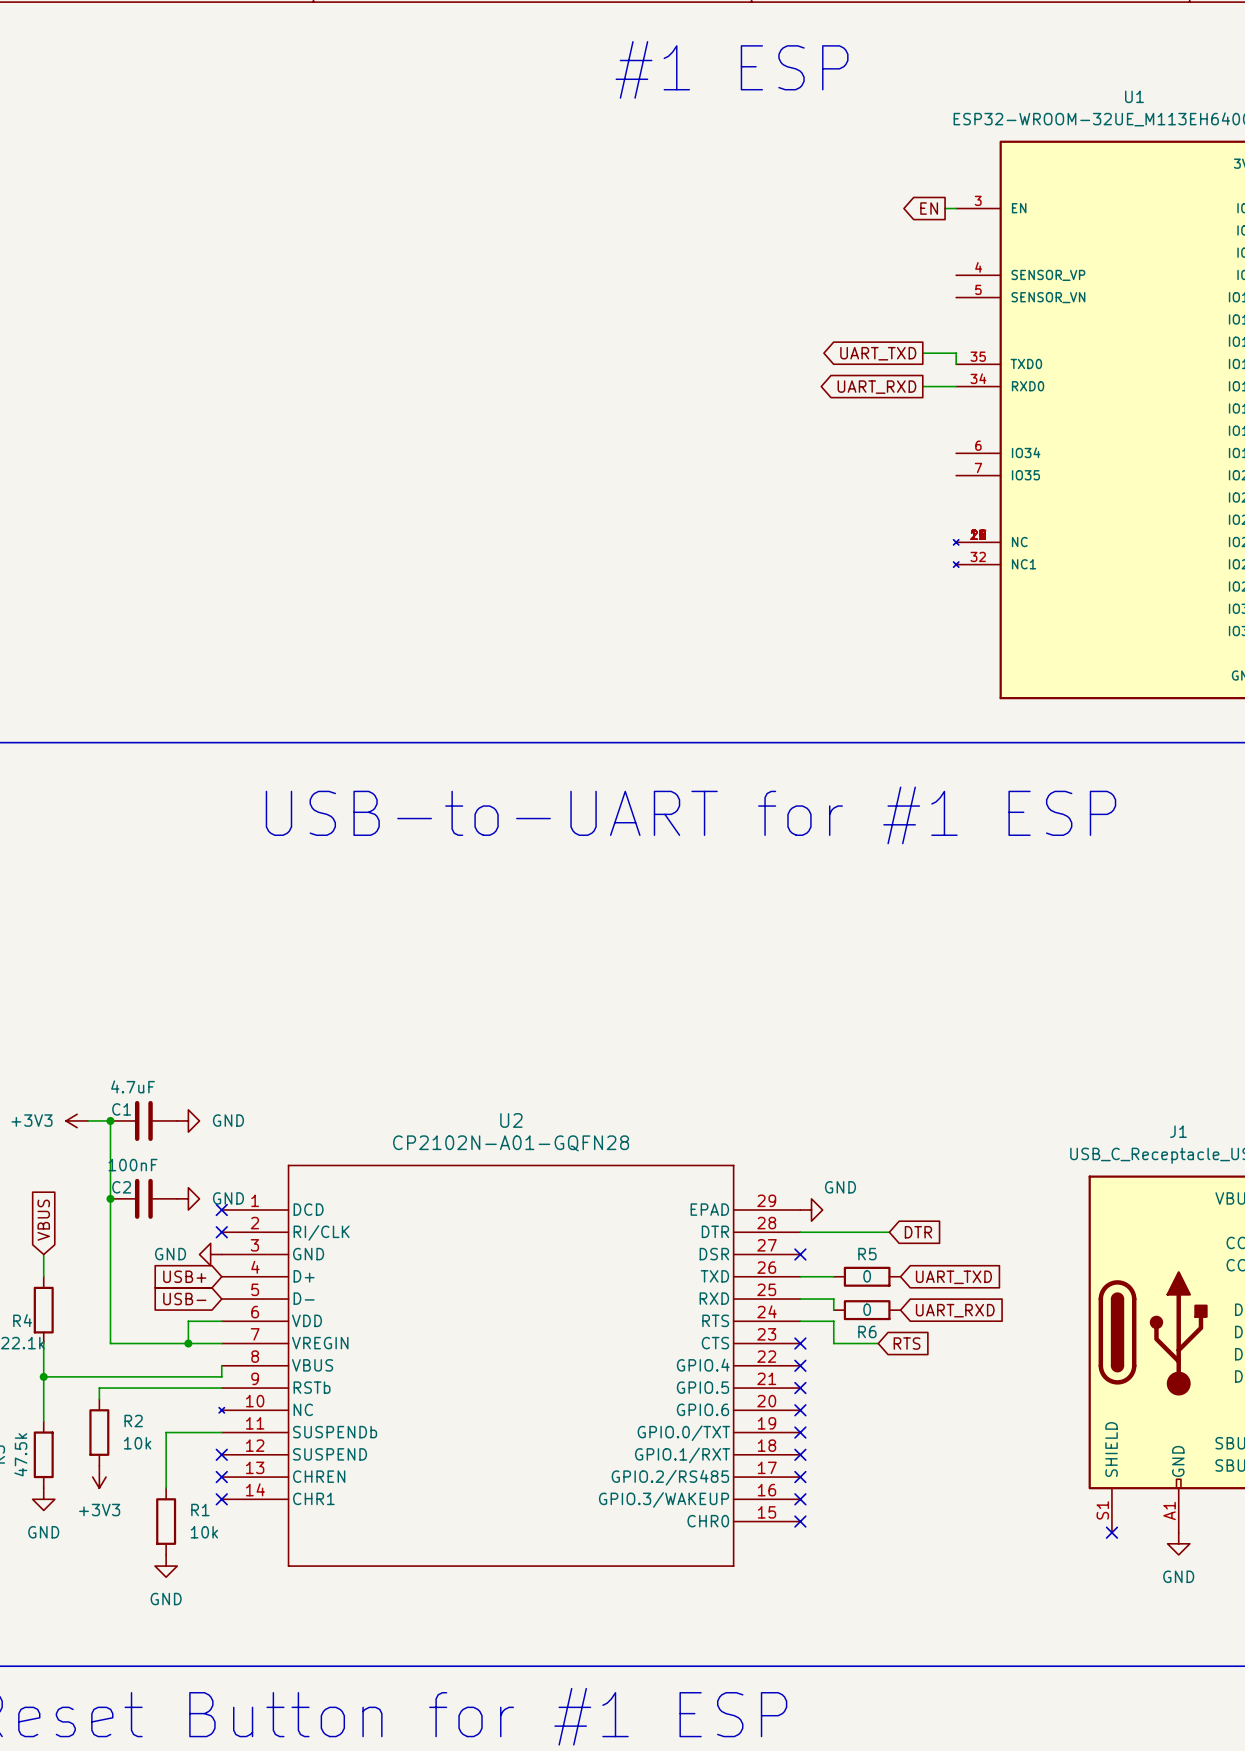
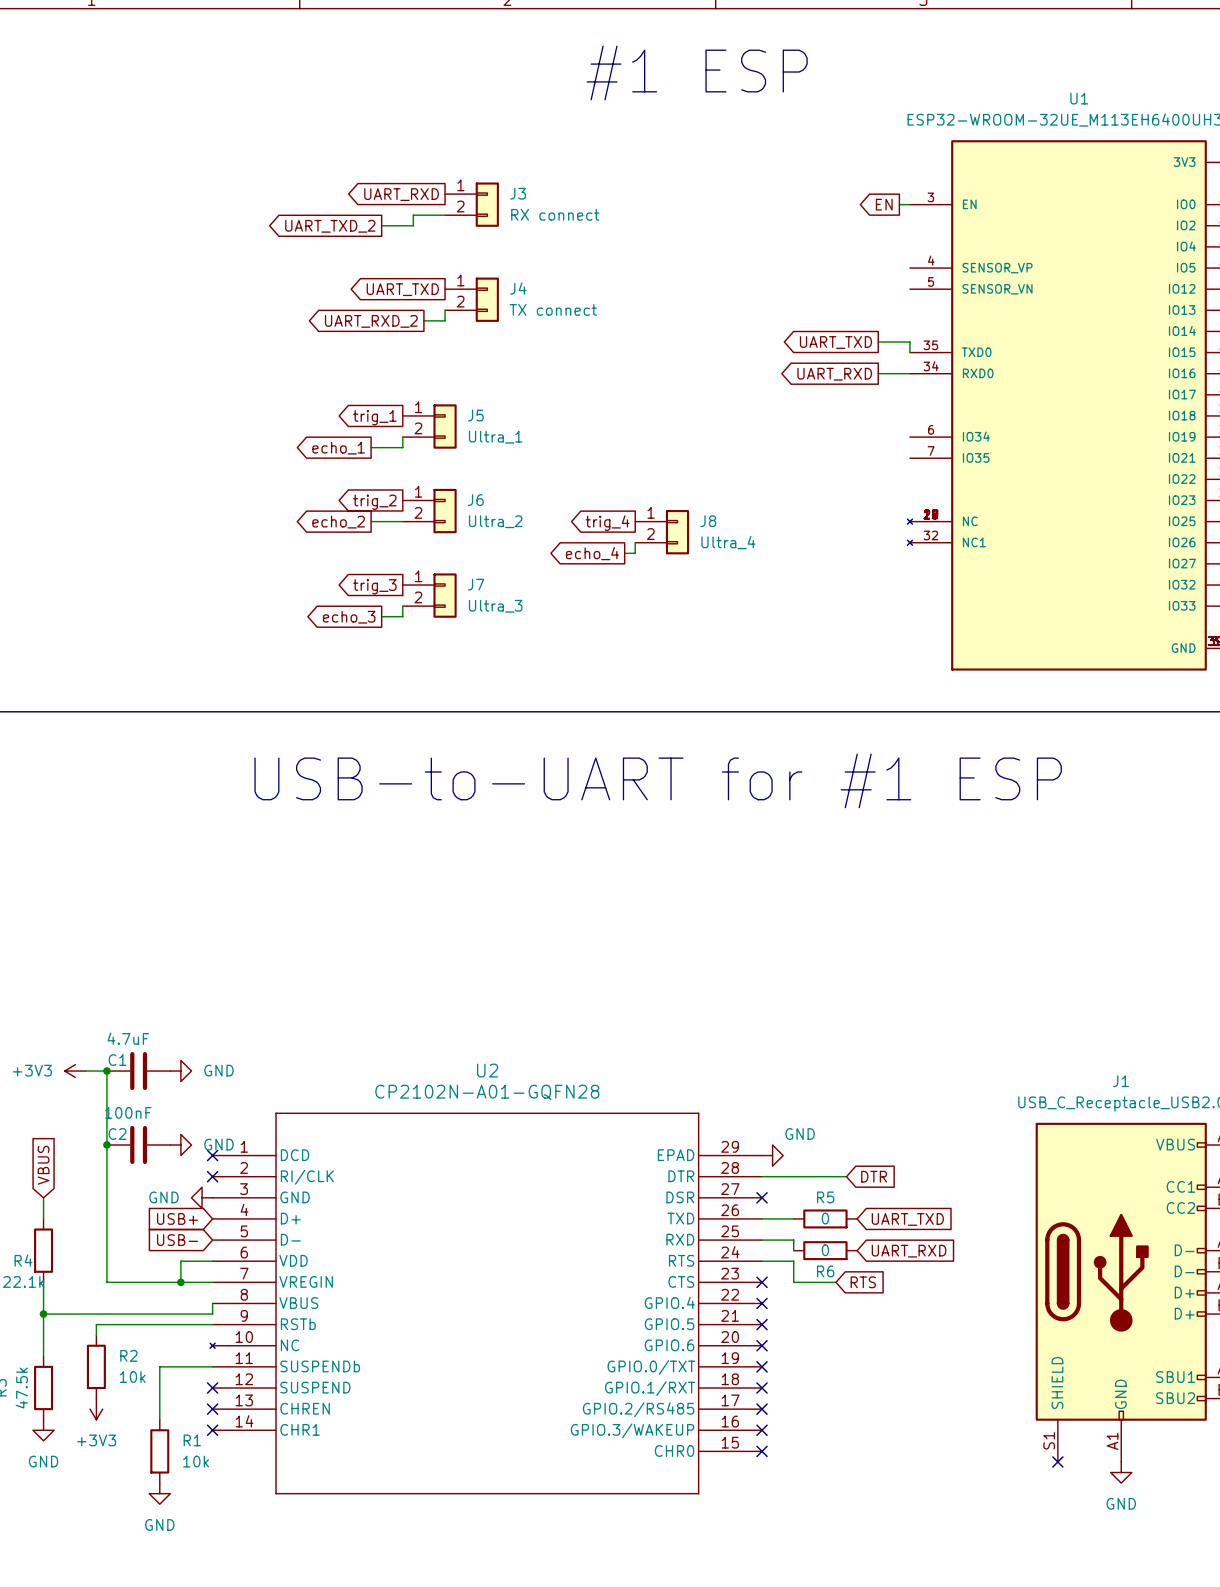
global label: none -> UART_RXD (401, 194)
J3: none -> RX connect (471, 204)
wire: none -> (445, 215) (413, 215) (413, 225) (381, 225)
global label: none -> UART_TXD_2 (330, 226)
global label: none -> UART_TXD (402, 289)
J4: none -> TX connect (471, 299)
wire: none -> (445, 310) (445, 320) (423, 320)
global label: none -> UART_RXD_2 (371, 321)
global label: none -> trig_1 (374, 417)
J5: none -> Ultra_1 (429, 426)
wire: none -> (402, 437) (402, 447) (371, 447)
global label: none -> echo_1 (338, 448)
global label: none -> trig_2 (374, 502)
J6: none -> Ultra_2 (429, 511)
global label: none -> echo_2 (338, 522)
wire: none -> (371, 521) (402, 521)
global label: none -> trig_4 (607, 523)
J8: none -> Ultra_4 (662, 532)
wire: none -> (635, 542) (635, 553) (624, 553)
global label: none -> echo_4 (592, 553)
global label: none -> trig_3 (374, 586)
J7: none -> Ultra_3 (429, 595)
wire: none -> (402, 606) (402, 616) (381, 616)
global label: none -> echo_3 (349, 617)

